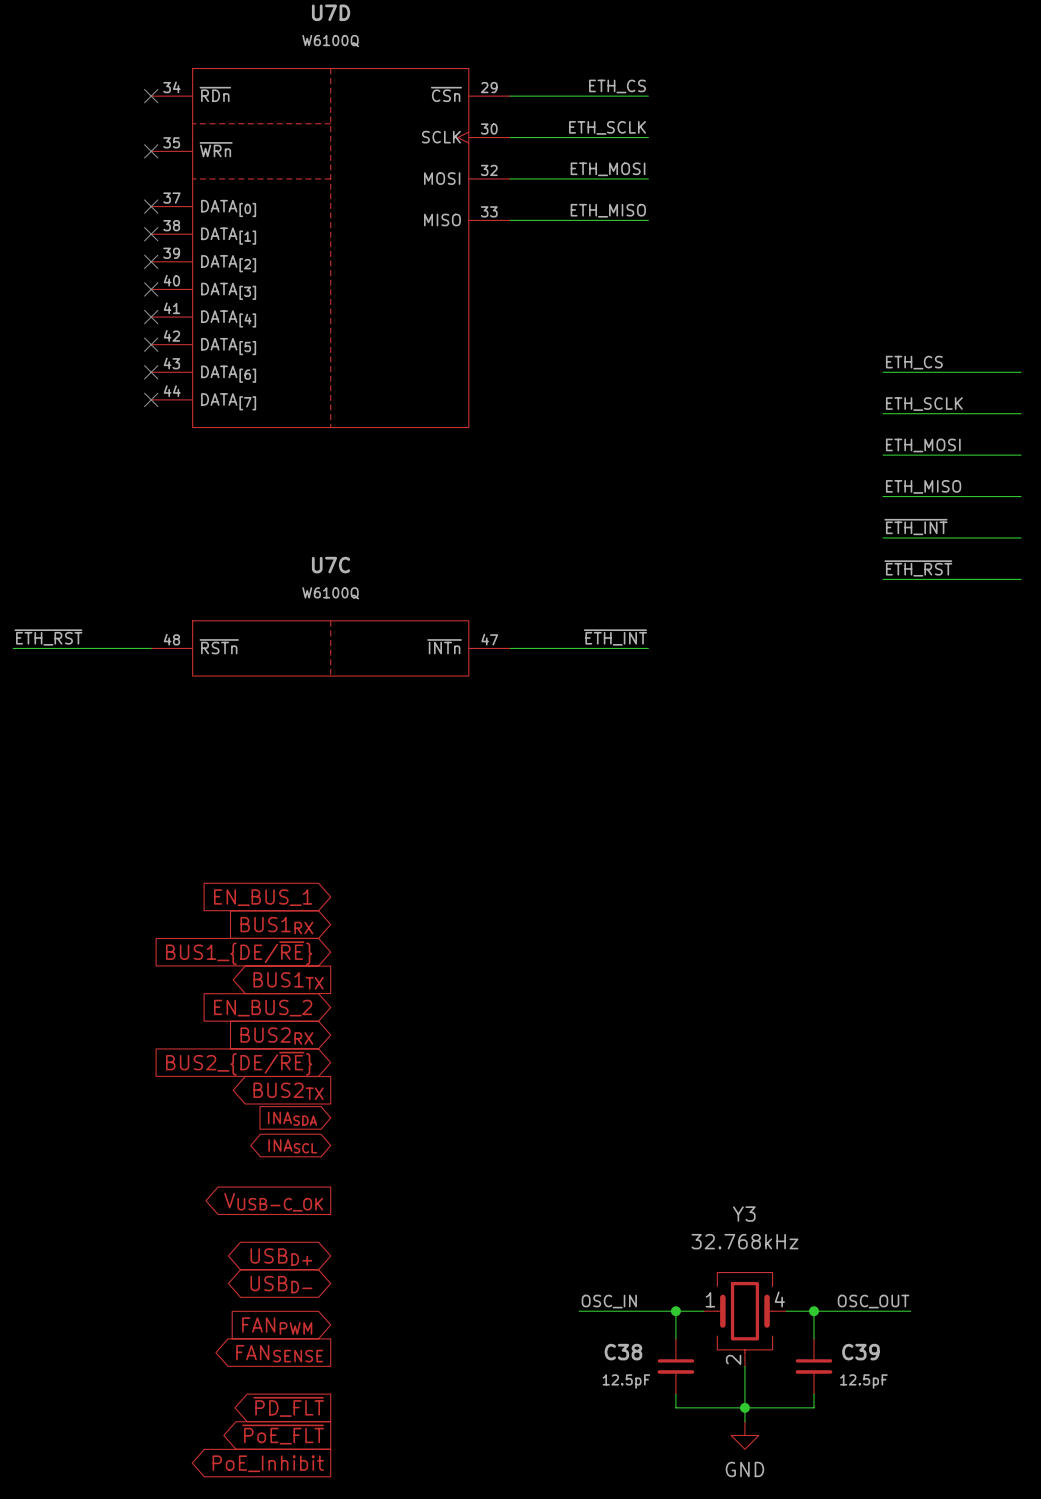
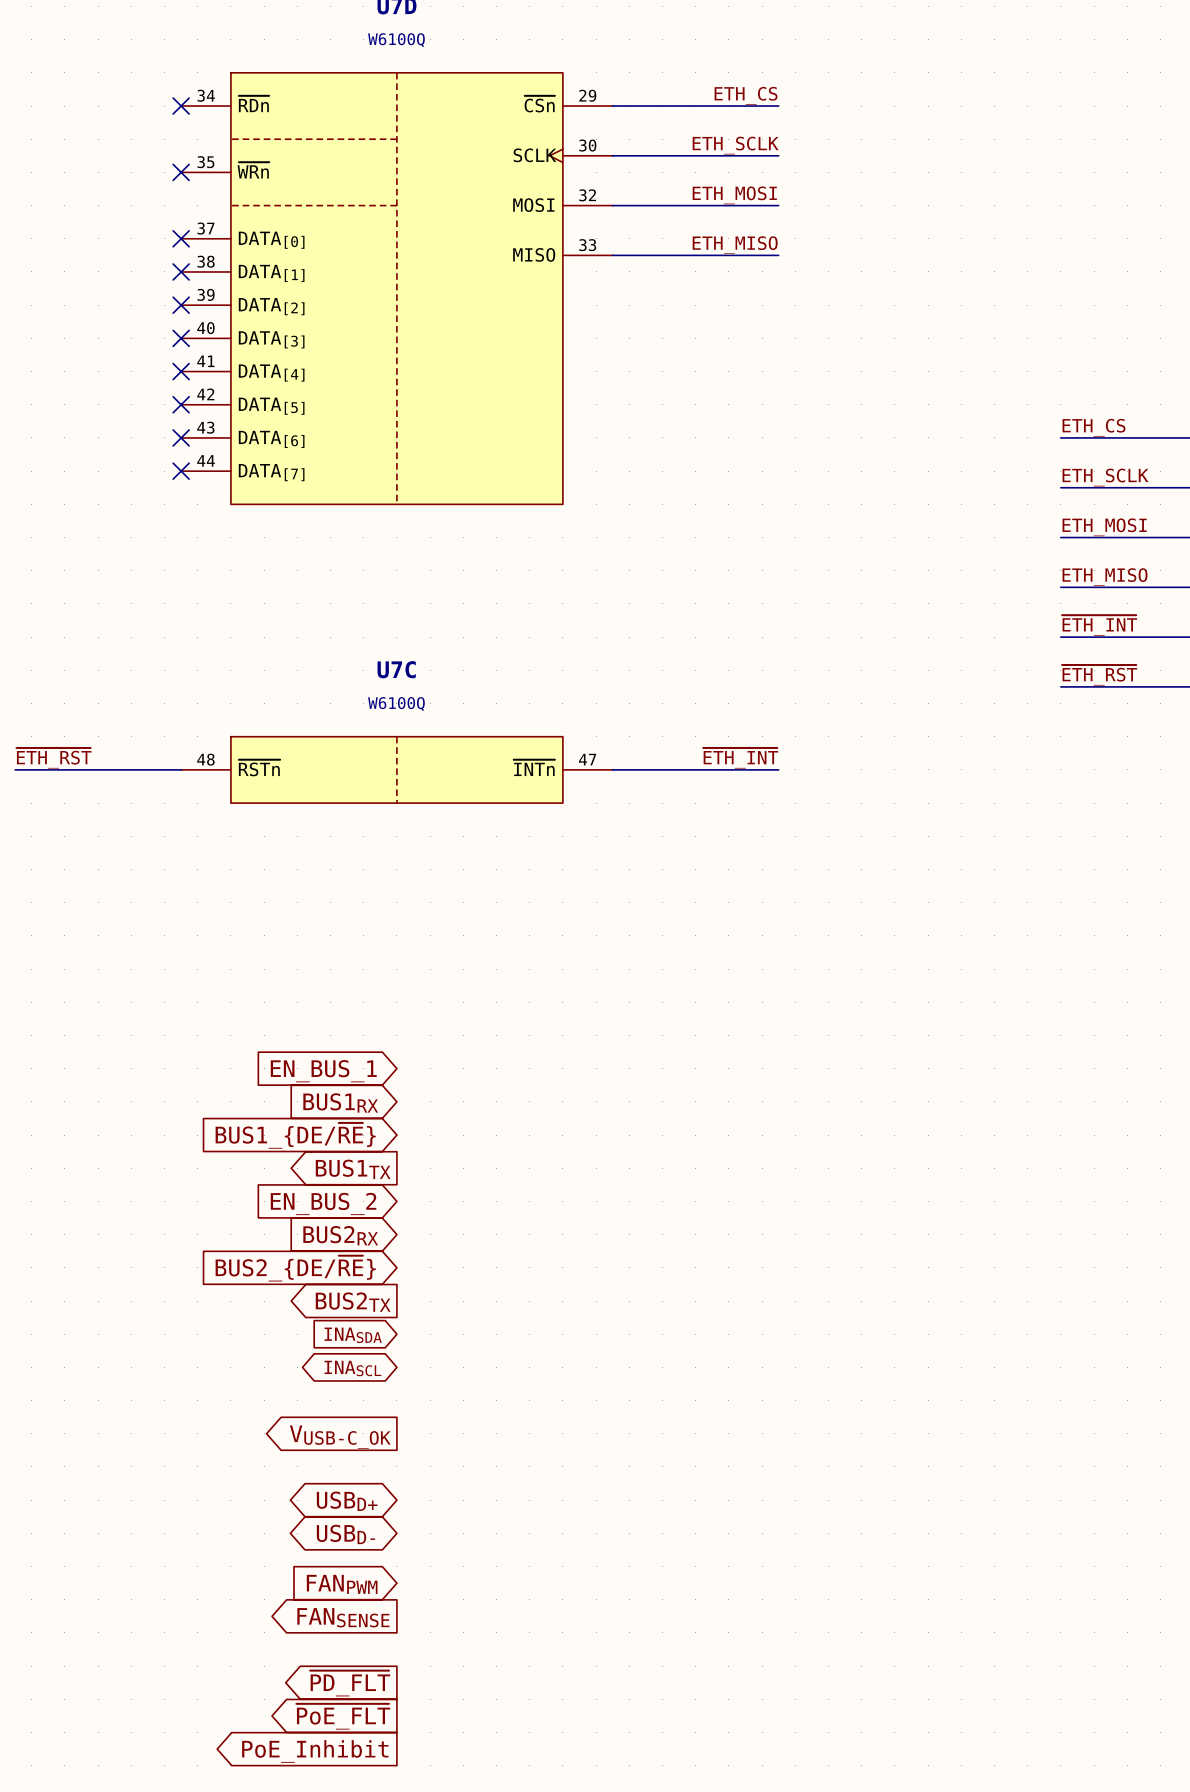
label: OSC_IN (609, 1301) -> none
label: OSC_OUT (873, 1301) -> none
wire: (579, 1311) (703, 1311) -> none
wire: (675, 1311) (675, 1338) -> none
junction: (675, 1311) -> none
wire: (786, 1311) (910, 1311) -> none
wire: (813, 1311) (813, 1338) -> none
junction: (813, 1311) -> none
Y3: 32.768kHz (744, 1319) -> none
C38: 12.5pF (675, 1366) -> none
wire: (744, 1366) (744, 1421) -> none
C39: 12.5pF (813, 1366) -> none
wire: (675, 1394) (675, 1407) (813, 1407) (813, 1394) -> none
junction: (744, 1407) -> none
power symbol: GND (744, 1435) -> none

